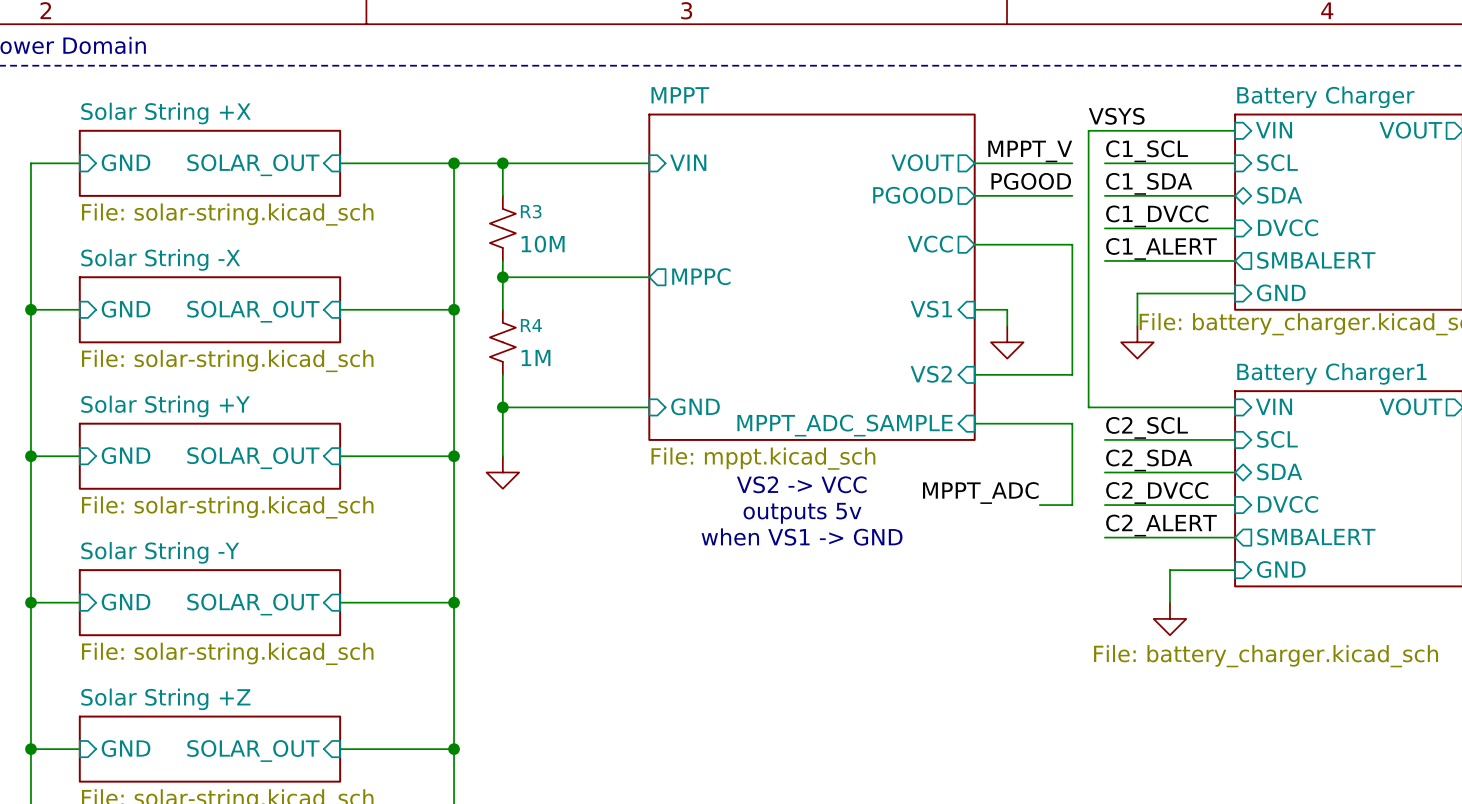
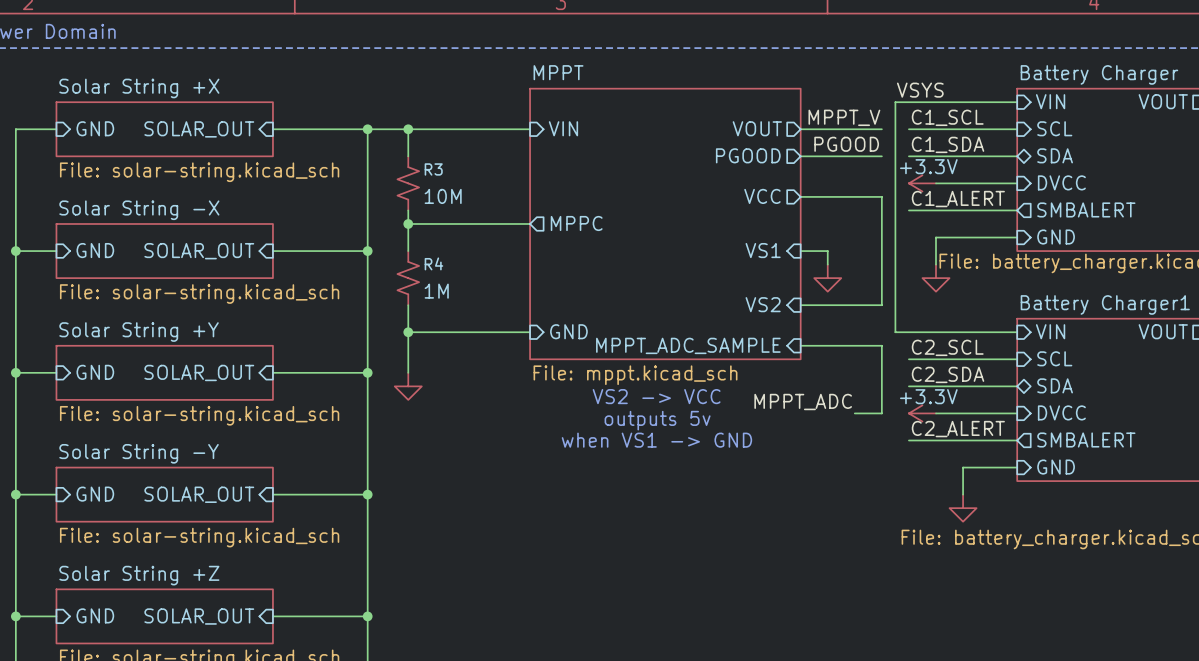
label: C1_DVCC (1157, 216) -> none
power symbol: none -> +3.3V (922, 183)
label: C2_DVCC (1157, 493) -> none
power symbol: none -> +3.3V (922, 413)

